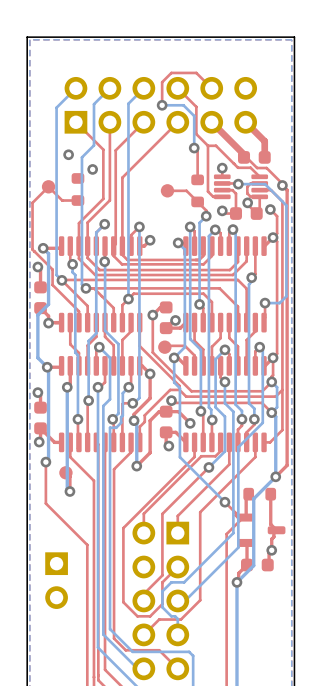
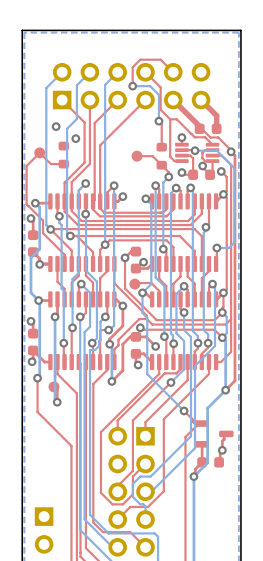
top track: (248, 494) (246, 496) (246, 517) -> none
part: (259, 494) -> none
top track: (270, 494) (270, 524) (276, 530) -> none
part position: (56, 580) -> (44, 530)

